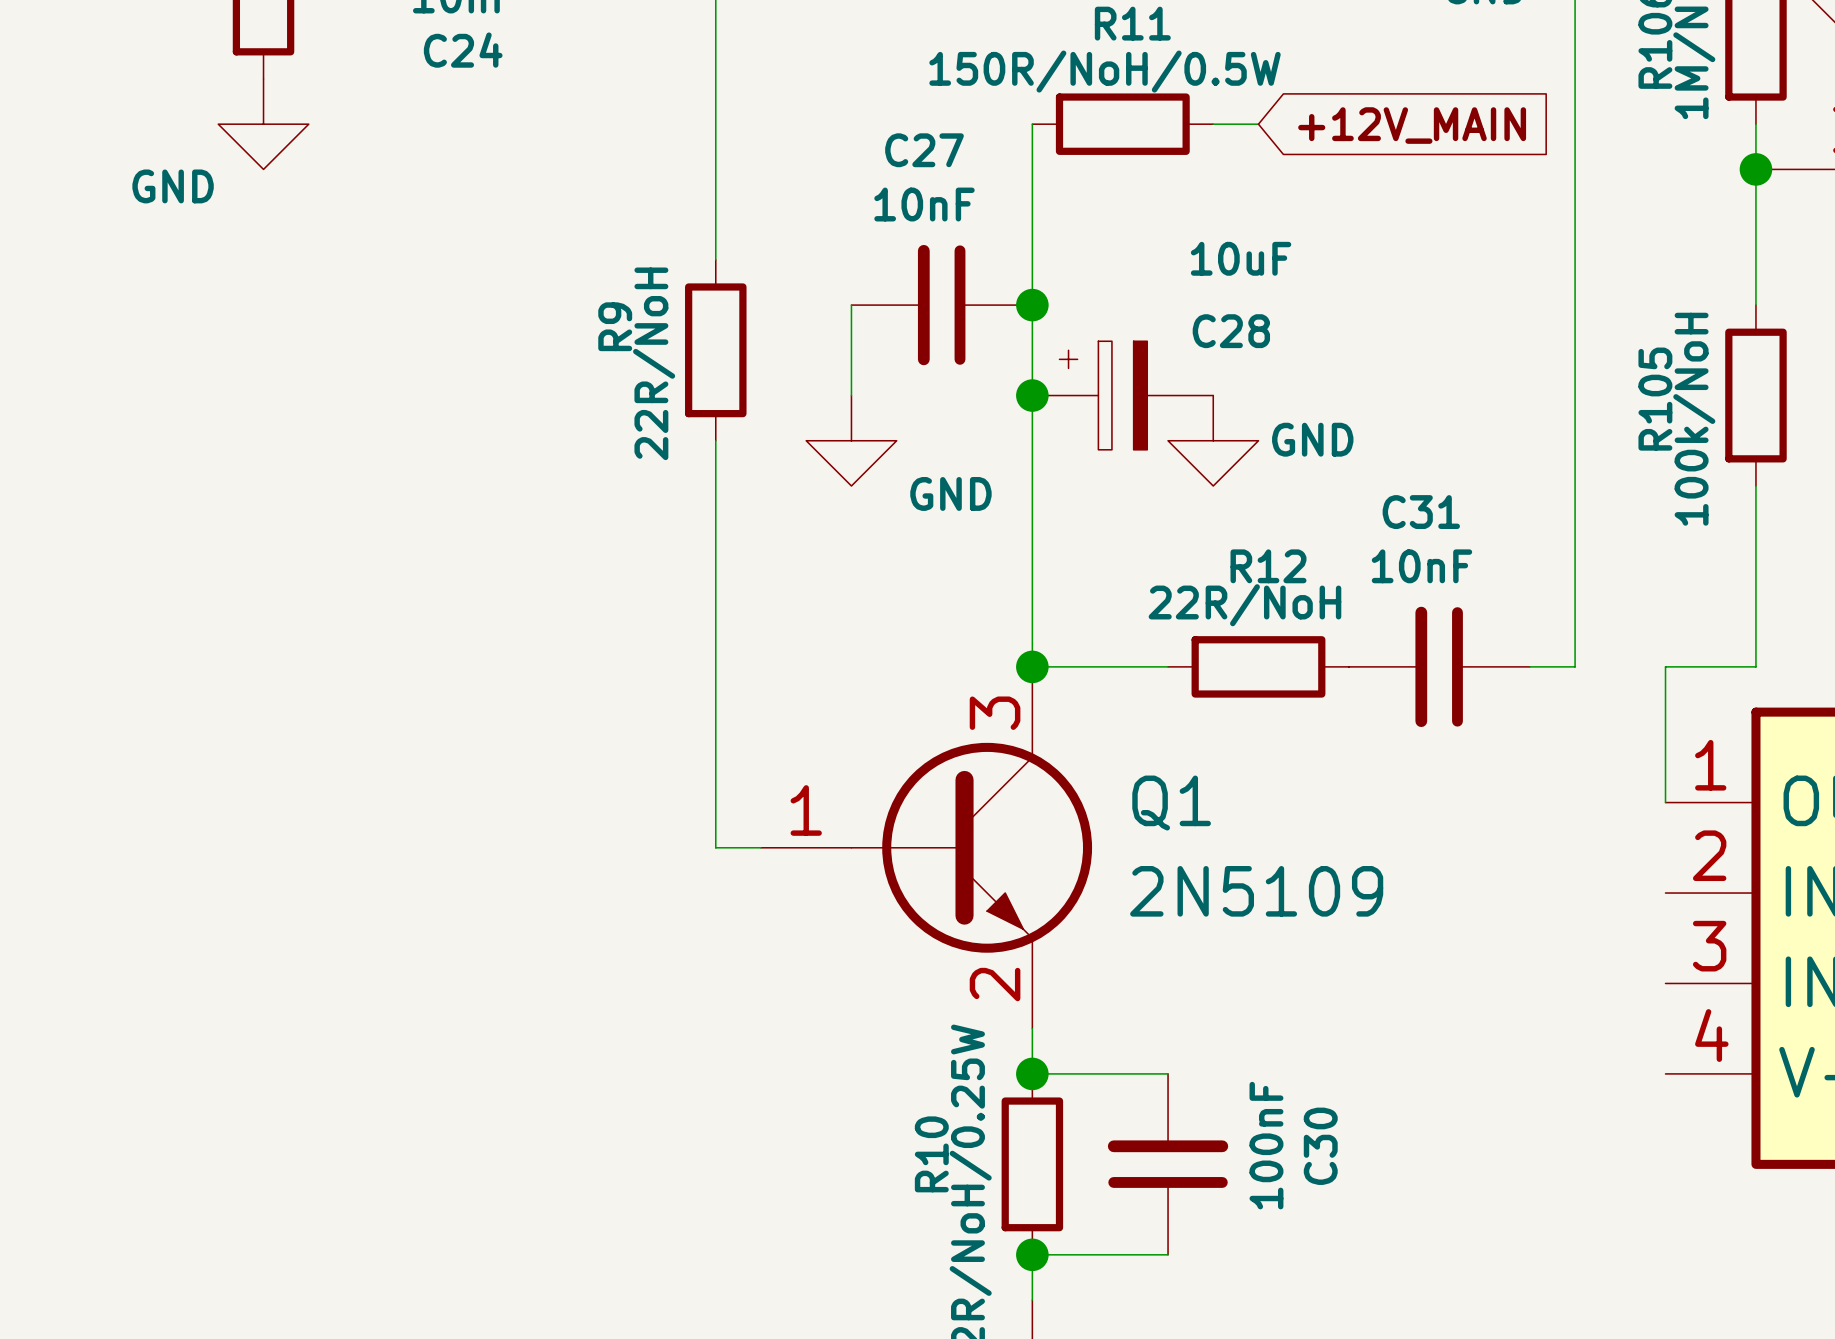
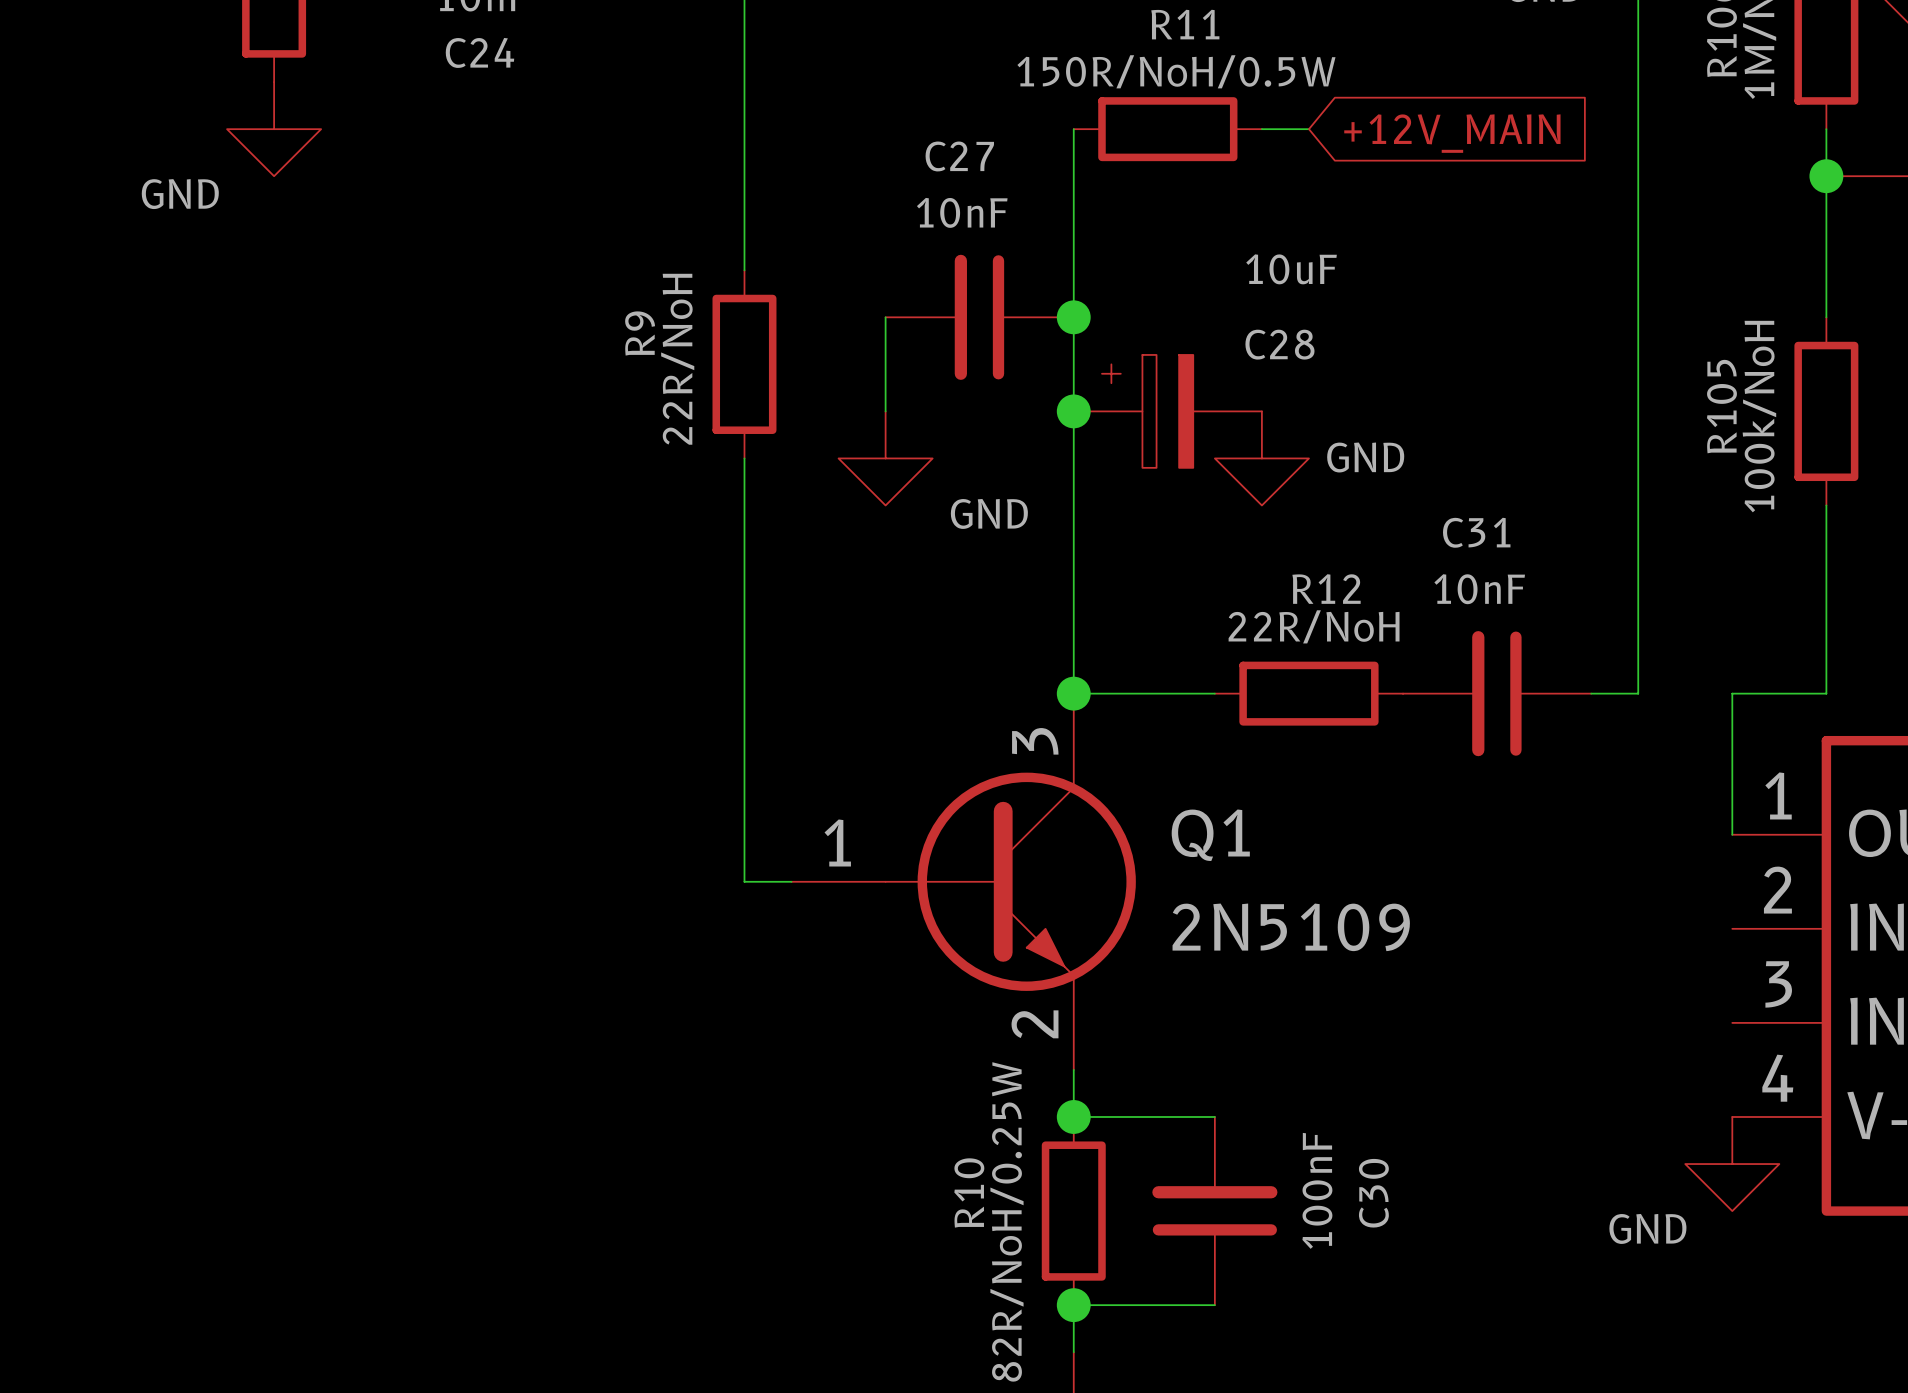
power symbol: none -> GND (1732, 1164)

